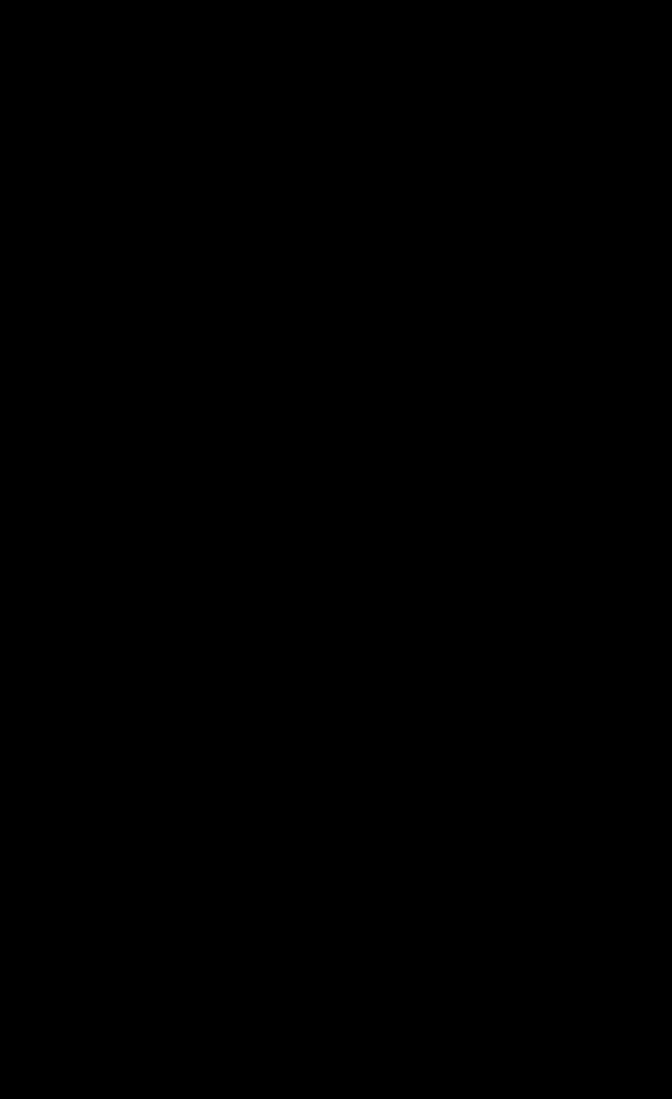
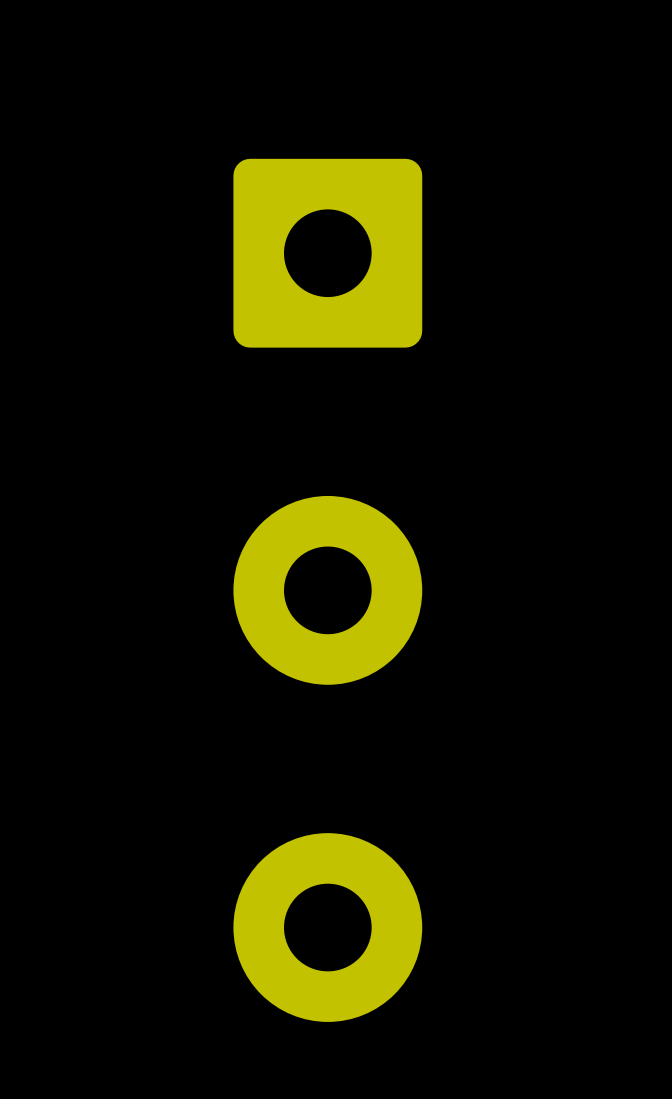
part: none -> (327, 590)

